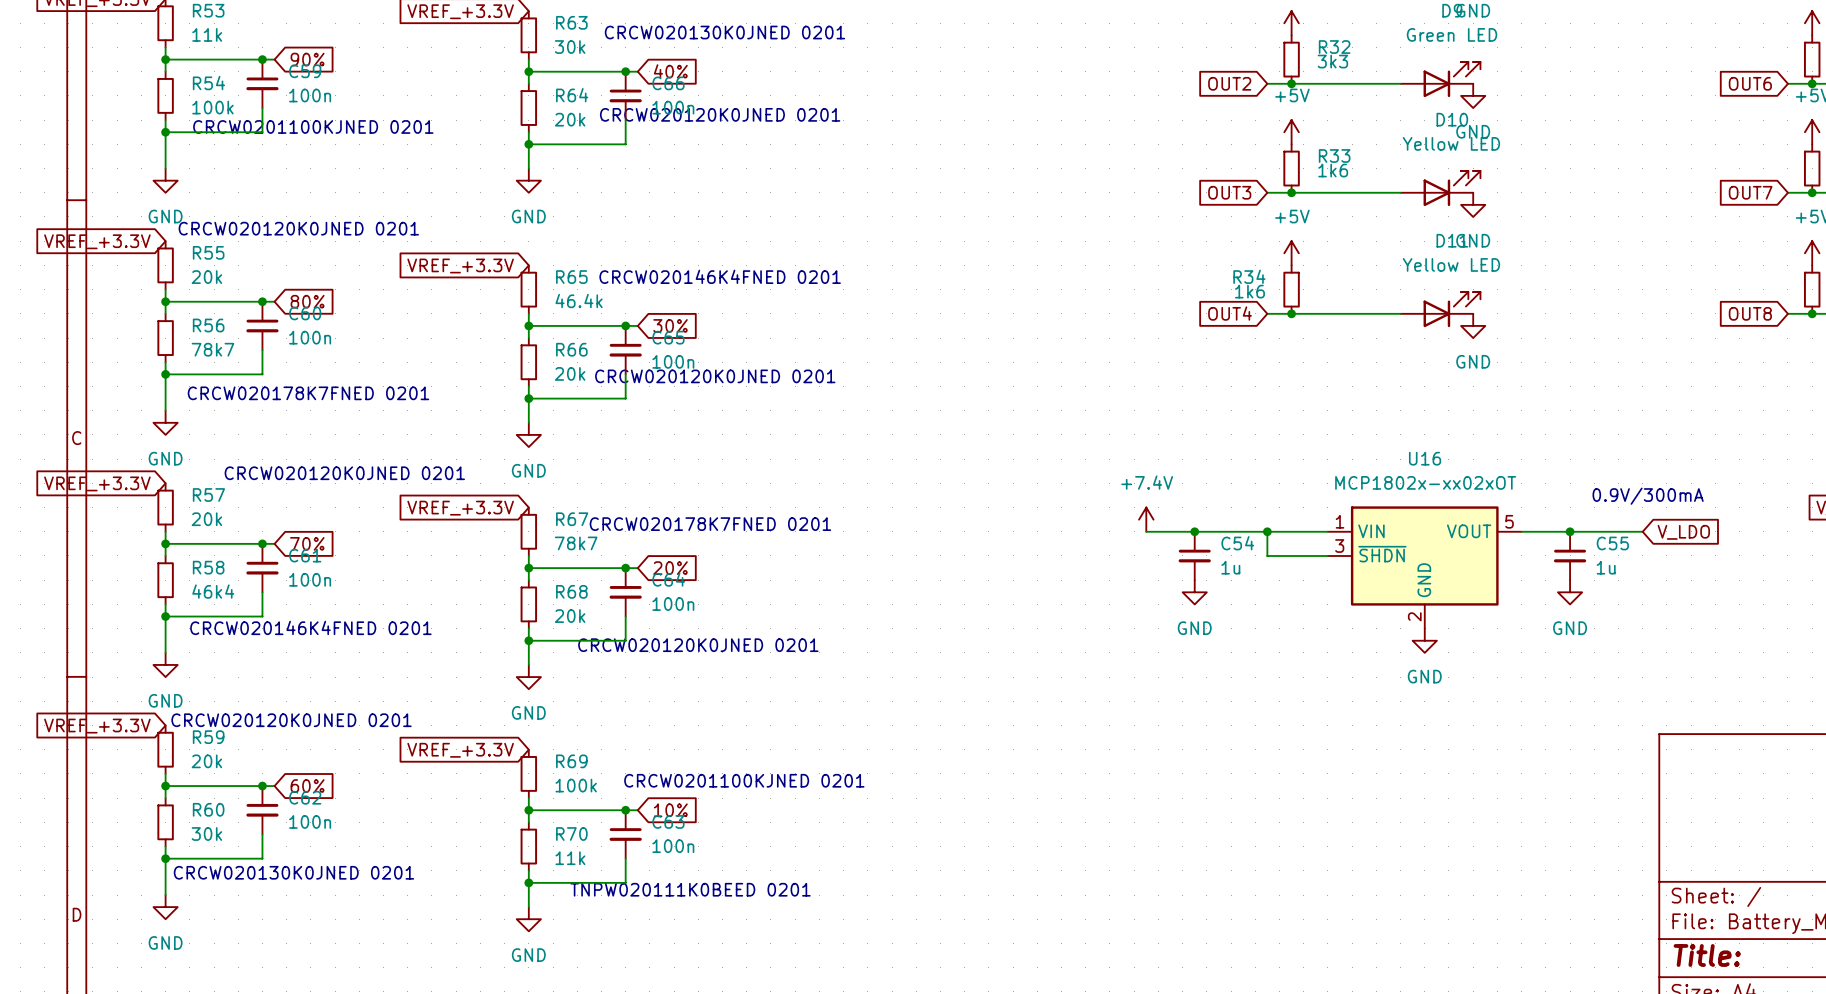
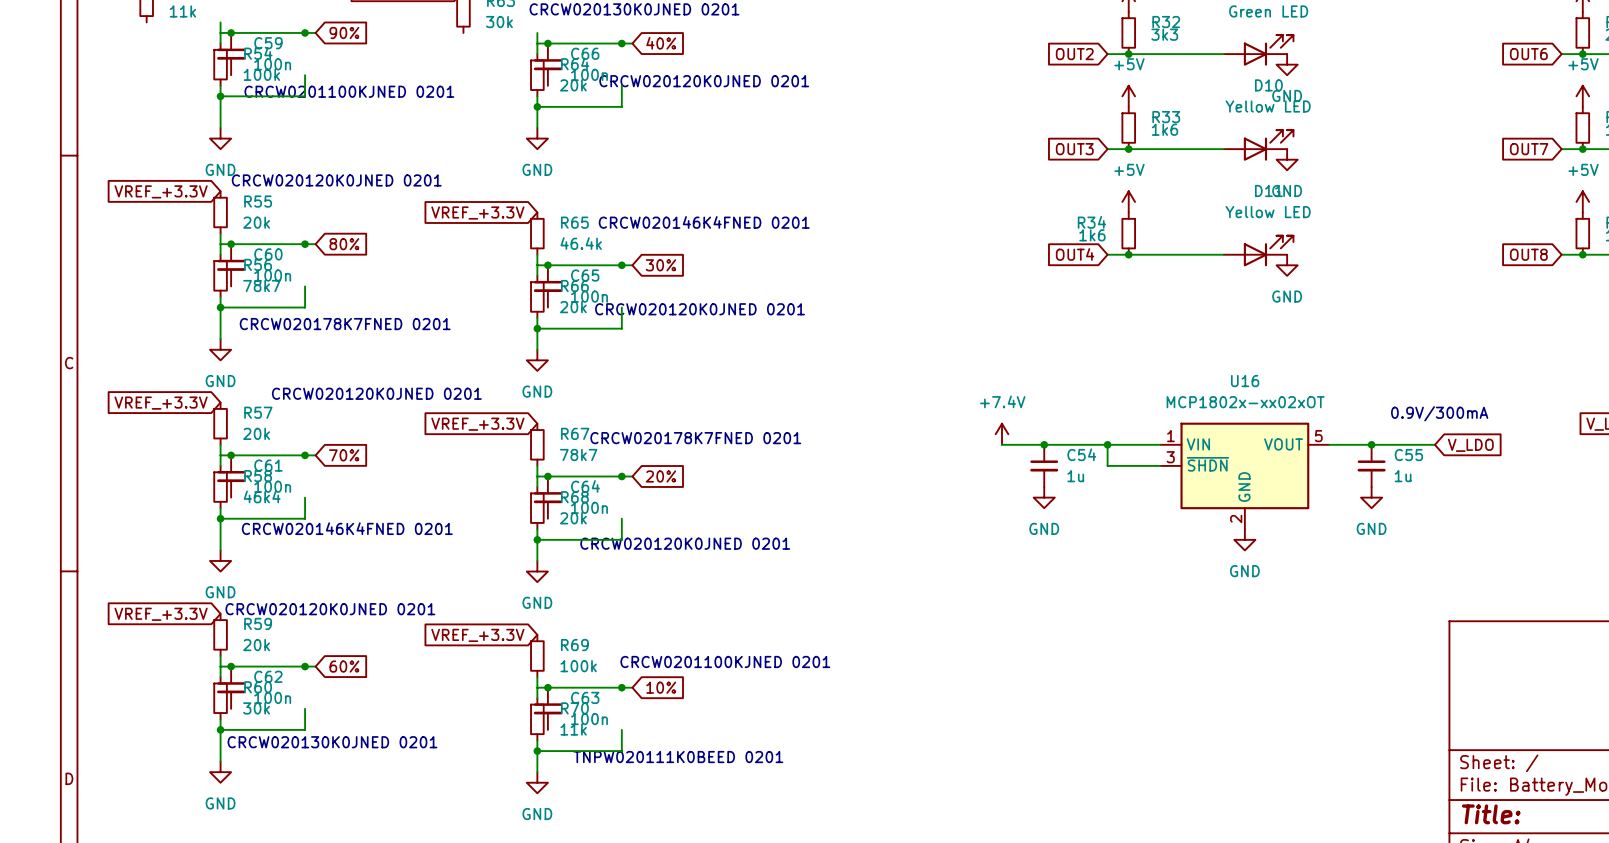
wire: (165, 47) (165, 71) -> (220, 22) (220, 43)
wire: (165, 59) (250, 59) -> (241, 32) (315, 32)
junction: (165, 59) -> none
global label position: 90% (307, 59) -> 90% (344, 32)
junction: none -> (305, 32)
wire: (528, 59) (528, 83) -> (537, 32) (537, 54)
wire: (528, 71) (613, 71) -> (558, 43) (632, 43)
junction: (528, 71) -> none
global label position: 40% (670, 71) -> 40% (661, 43)
junction: none -> (621, 43)
R54 position: (165, 95) -> (220, 64)
wire: (262, 108) (262, 132) -> (305, 75) (305, 96) (231, 96)
R64 position: (528, 108) -> (537, 75)
text position: CRCW020120K0JNED 0201 (720, 114) -> CRCW020120K0JNED 0201 (704, 81)
wire: (165, 120) (165, 168) -> (220, 85) (220, 128)
wire: (625, 120) (625, 144) -> (621, 85) (621, 106) (547, 106)
text position: CRCW0201100KJNED 0201 (313, 126) -> CRCW0201100KJNED 0201 (349, 91)
wire: (165, 132) (250, 132) -> none
junction: (165, 132) -> none
junction: none -> (220, 96)
wire: (528, 132) (528, 168) -> (537, 96) (537, 128)
wire: (528, 144) (613, 144) -> none
junction: (528, 144) -> none
junction: none -> (537, 106)
power symbol position: GND (165, 180) -> GND (220, 138)
power symbol position: GND (528, 180) -> GND (537, 138)
text position: CRCW020120K0JNED 0201 (298, 228) -> CRCW020120K0JNED 0201 (336, 180)
global label position: VREF_+3.3V (97, 241) -> VREF_+3.3V (161, 191)
R55 position: (165, 265) -> (220, 212)
global label position: VREF_+3.3V (460, 265) -> VREF_+3.3V (477, 213)
text position: CRCW020146K4FNED 0201 (720, 276) -> CRCW020146K4FNED 0201 (704, 222)
wire: (165, 289) (165, 313) -> (220, 233) (220, 254)
R65 position: (528, 289) -> (537, 233)
wire: (165, 301) (250, 301) -> (241, 244) (315, 244)
junction: (165, 301) -> none
global label position: 80% (307, 301) -> 80% (344, 244)
junction: none -> (305, 244)
wire: (528, 313) (528, 338) -> (537, 254) (537, 275)
wire: (528, 325) (613, 325) -> (558, 265) (632, 265)
junction: (528, 325) -> none
global label position: 30% (670, 325) -> 30% (660, 265)
junction: none -> (621, 265)
R56 position: (165, 338) -> (220, 275)
wire: (262, 350) (262, 374) -> (305, 286) (305, 307) (231, 307)
wire: (165, 362) (165, 410) -> (220, 296) (220, 339)
R66 position: (528, 362) -> (537, 296)
wire: (165, 374) (250, 374) -> none
junction: (165, 374) -> none
junction: none -> (220, 307)
wire: (625, 374) (625, 398) -> (621, 307) (621, 328) (547, 328)
text position: CRCW020120K0JNED 0201 (715, 376) -> CRCW020120K0JNED 0201 (699, 309)
wire: (528, 386) (528, 422) -> (537, 318) (537, 349)
text position: CRCW020178K7FNED 0201 (308, 393) -> CRCW020178K7FNED 0201 (345, 324)
wire: (528, 398) (613, 398) -> none
junction: (528, 398) -> none
junction: none -> (537, 328)
power symbol position: GND (165, 422) -> GND (220, 349)
power symbol position: GND (528, 434) -> GND (537, 360)
text position: CRCW020120K0JNED 0201 (344, 473) -> CRCW020120K0JNED 0201 (376, 393)
global label position: VREF_+3.3V (97, 483) -> VREF_+3.3V (161, 403)
R57 position: (165, 507) -> (220, 423)
global label position: VREF_+3.3V (460, 508) -> VREF_+3.3V (477, 424)
text position: CRCW020178K7FNED 0201 (710, 524) -> CRCW020178K7FNED 0201 (695, 438)
wire: (165, 531) (165, 555) -> (220, 444) (220, 465)
R67 position: (528, 531) -> (537, 444)
wire: (165, 543) (250, 543) -> (241, 455) (315, 455)
junction: (165, 543) -> none
global label position: 70% (307, 543) -> 70% (344, 455)
junction: none -> (305, 455)
wire: (528, 555) (528, 580) -> (537, 465) (537, 487)
wire: (528, 568) (613, 568) -> (558, 476) (632, 476)
junction: (528, 568) -> none
global label position: 20% (670, 568) -> 20% (660, 476)
junction: none -> (621, 476)
R58 position: (165, 580) -> (220, 487)
wire: (262, 592) (262, 616) -> (305, 497) (305, 518) (231, 518)
wire: (165, 604) (165, 652) -> (220, 508) (220, 550)
R68 position: (528, 604) -> (537, 508)
wire: (165, 616) (250, 616) -> none
junction: (165, 616) -> none
junction: none -> (220, 518)
wire: (625, 616) (625, 640) -> (621, 518) (621, 539) (547, 539)
text position: CRCW020146K4FNED 0201 (310, 627) -> CRCW020146K4FNED 0201 (347, 528)
wire: (528, 628) (528, 664) -> (537, 529) (537, 560)
wire: (528, 640) (613, 640) -> none
junction: (528, 640) -> none
junction: none -> (537, 539)
text position: CRCW020120K0JNED 0201 (698, 645) -> CRCW020120K0JNED 0201 (685, 543)
power symbol position: GND (165, 664) -> GND (220, 560)
power symbol position: GND (528, 677) -> GND (537, 571)
text position: CRCW020120K0JNED 0201 (291, 720) -> CRCW020120K0JNED 0201 (330, 609)
global label position: VREF_+3.3V (97, 726) -> VREF_+3.3V (161, 614)
R59 position: (165, 749) -> (220, 634)
global label position: VREF_+3.3V (460, 750) -> VREF_+3.3V (477, 635)
wire: (165, 773) (165, 798) -> (220, 656) (220, 677)
R69 position: (528, 773) -> (537, 656)
text position: CRCW0201100KJNED 0201 (744, 780) -> CRCW0201100KJNED 0201 (725, 661)
wire: (165, 786) (250, 786) -> (241, 666) (315, 666)
junction: (165, 786) -> none
global label position: 60% (307, 786) -> 60% (344, 666)
junction: none -> (305, 666)
wire: (528, 798) (528, 822) -> (537, 677) (537, 698)
wire: (528, 810) (613, 810) -> (558, 687) (632, 687)
junction: (528, 810) -> none
global label position: 10% (670, 810) -> 10% (661, 687)
junction: none -> (621, 687)
R60 position: (165, 822) -> (220, 698)
wire: (262, 834) (262, 858) -> (305, 708) (305, 729) (231, 729)
wire: (165, 846) (165, 895) -> (220, 719) (220, 761)
R70 position: (528, 846) -> (537, 719)
wire: (165, 858) (250, 858) -> none
junction: (165, 858) -> none
junction: none -> (220, 729)
wire: (625, 858) (625, 882) -> (621, 729) (621, 751) (547, 751)
wire: (528, 870) (528, 907) -> (537, 740) (537, 772)
text position: CRCW020130K0JNED 0201 (293, 872) -> CRCW020130K0JNED 0201 (332, 742)
wire: (528, 882) (613, 882) -> none
junction: (528, 882) -> none
junction: none -> (537, 751)
text position: TNPW020111K0BEED 0201 (690, 889) -> TNPW020111K0BEED 0201 (678, 757)
power symbol position: GND (165, 907) -> GND (220, 772)
power symbol position: GND (528, 919) -> GND (537, 782)

